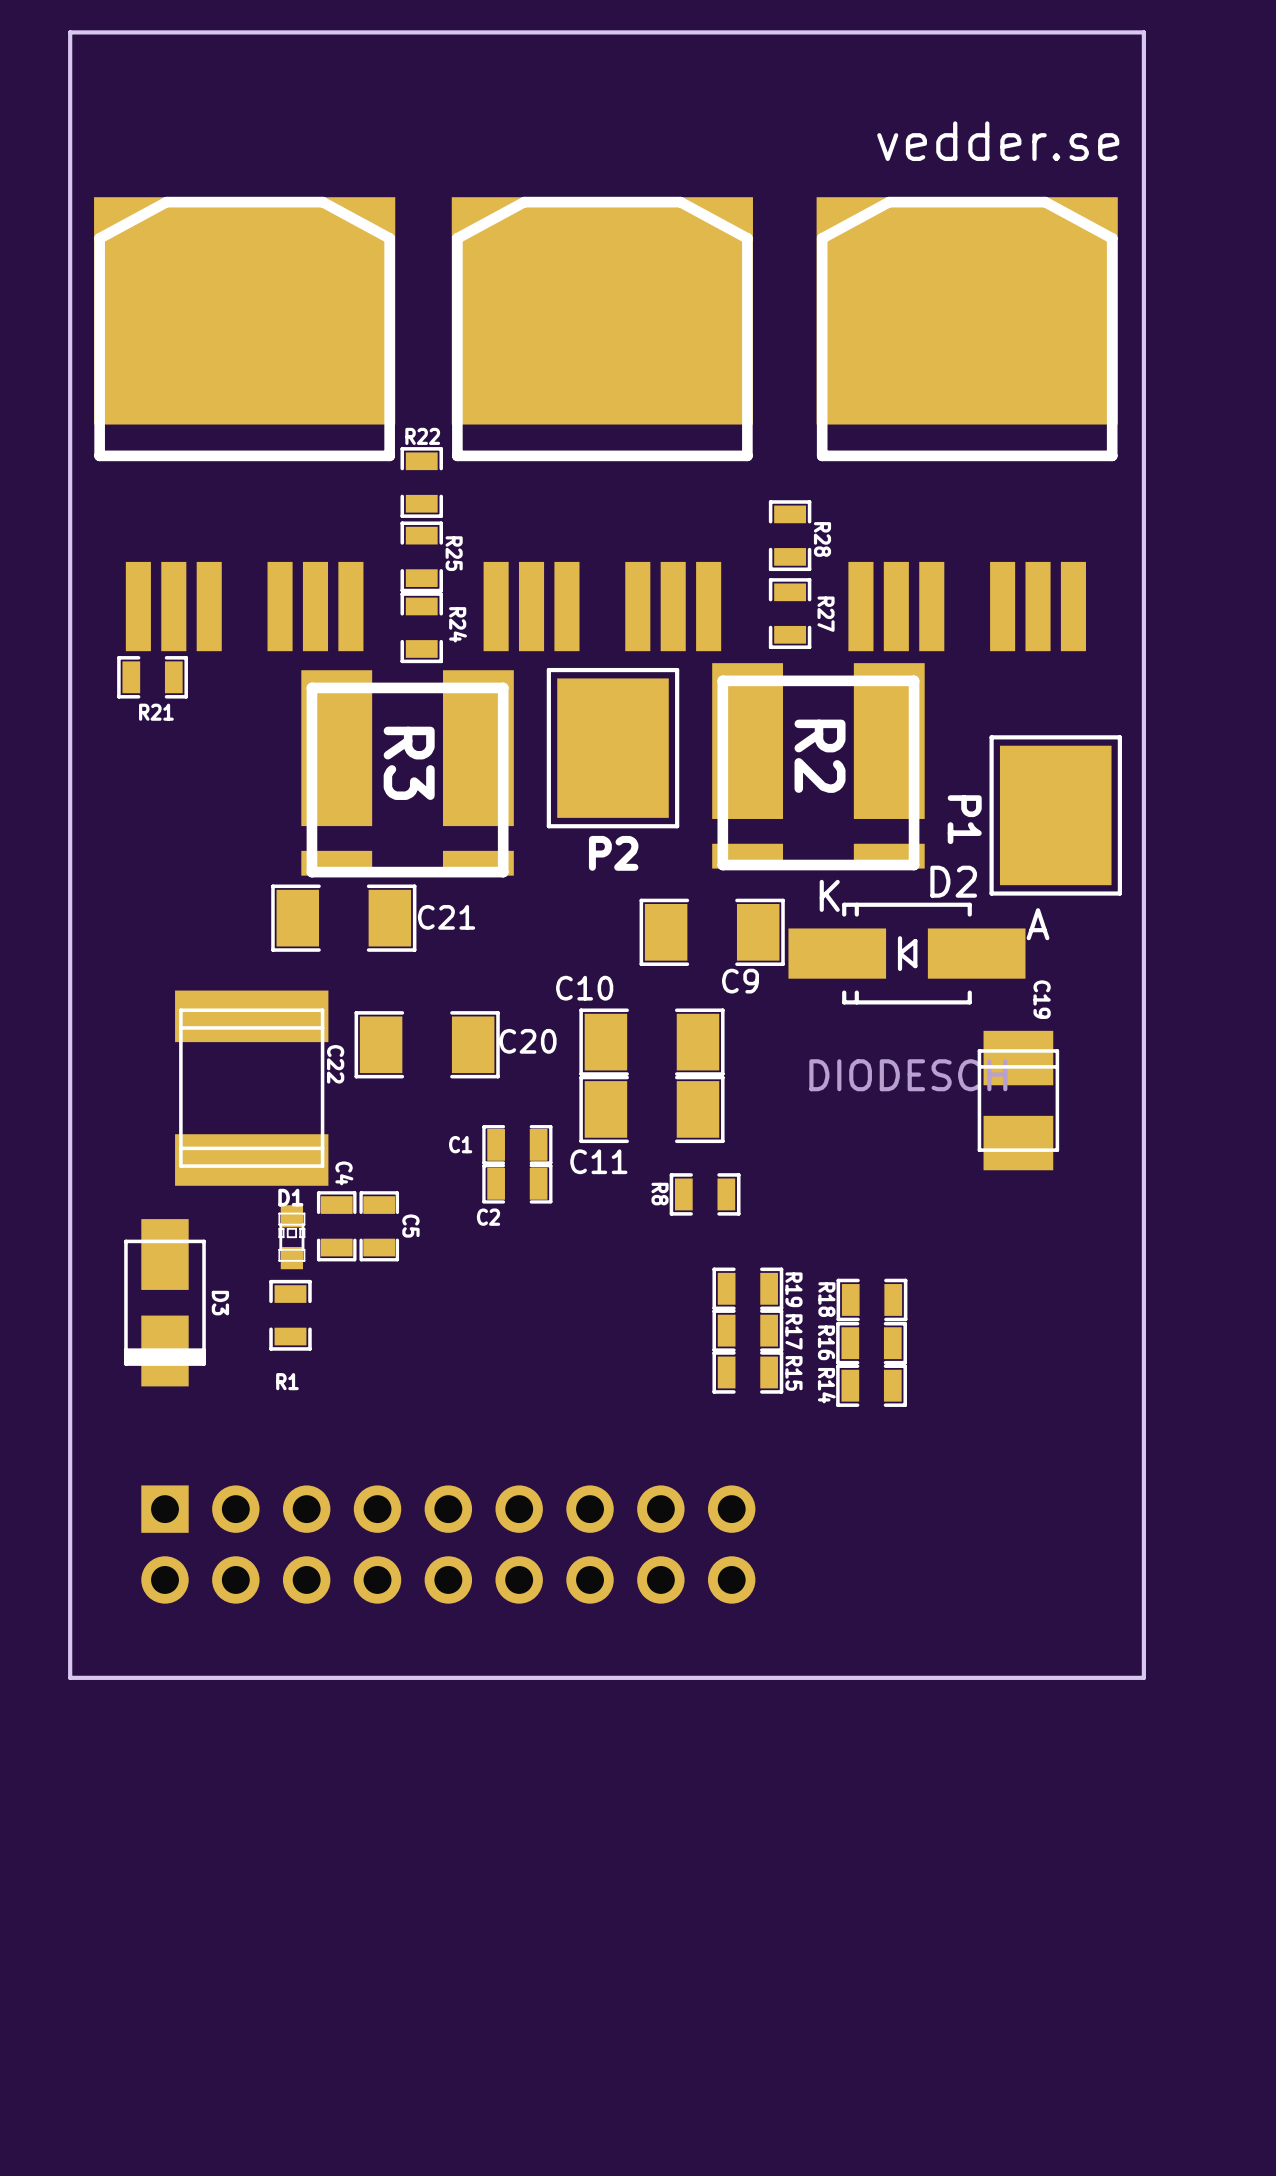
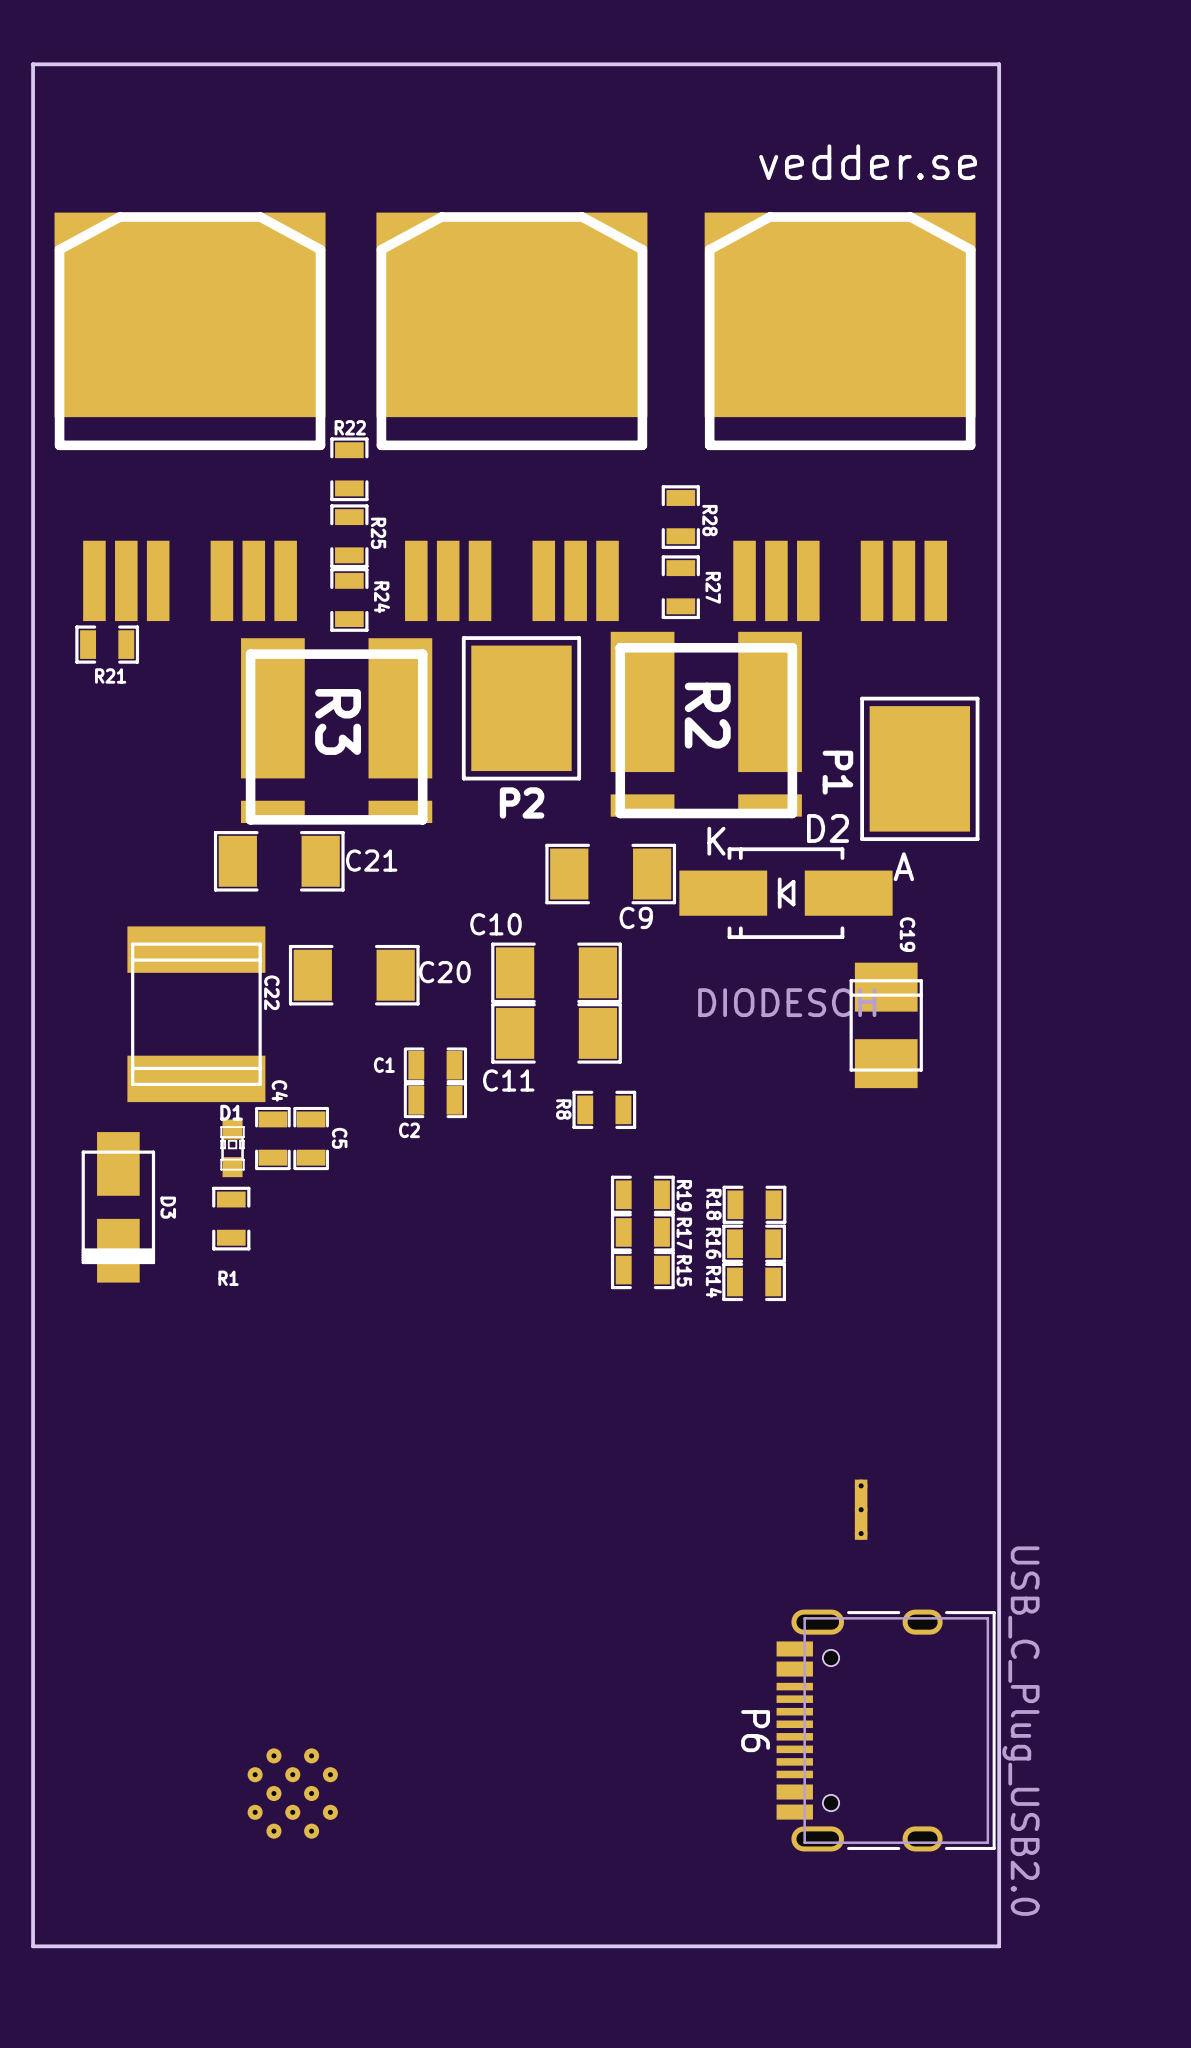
part: (448, 1544) -> none
part: none -> (861, 1509)
board edge: (1143, 1677) (70, 1677) -> (999, 1544) (999, 1946) (33, 1946) (33, 1544)
P6: none -> USB_C_Plug_USB2.0 (886, 1730)
part: none -> (292, 1793)

